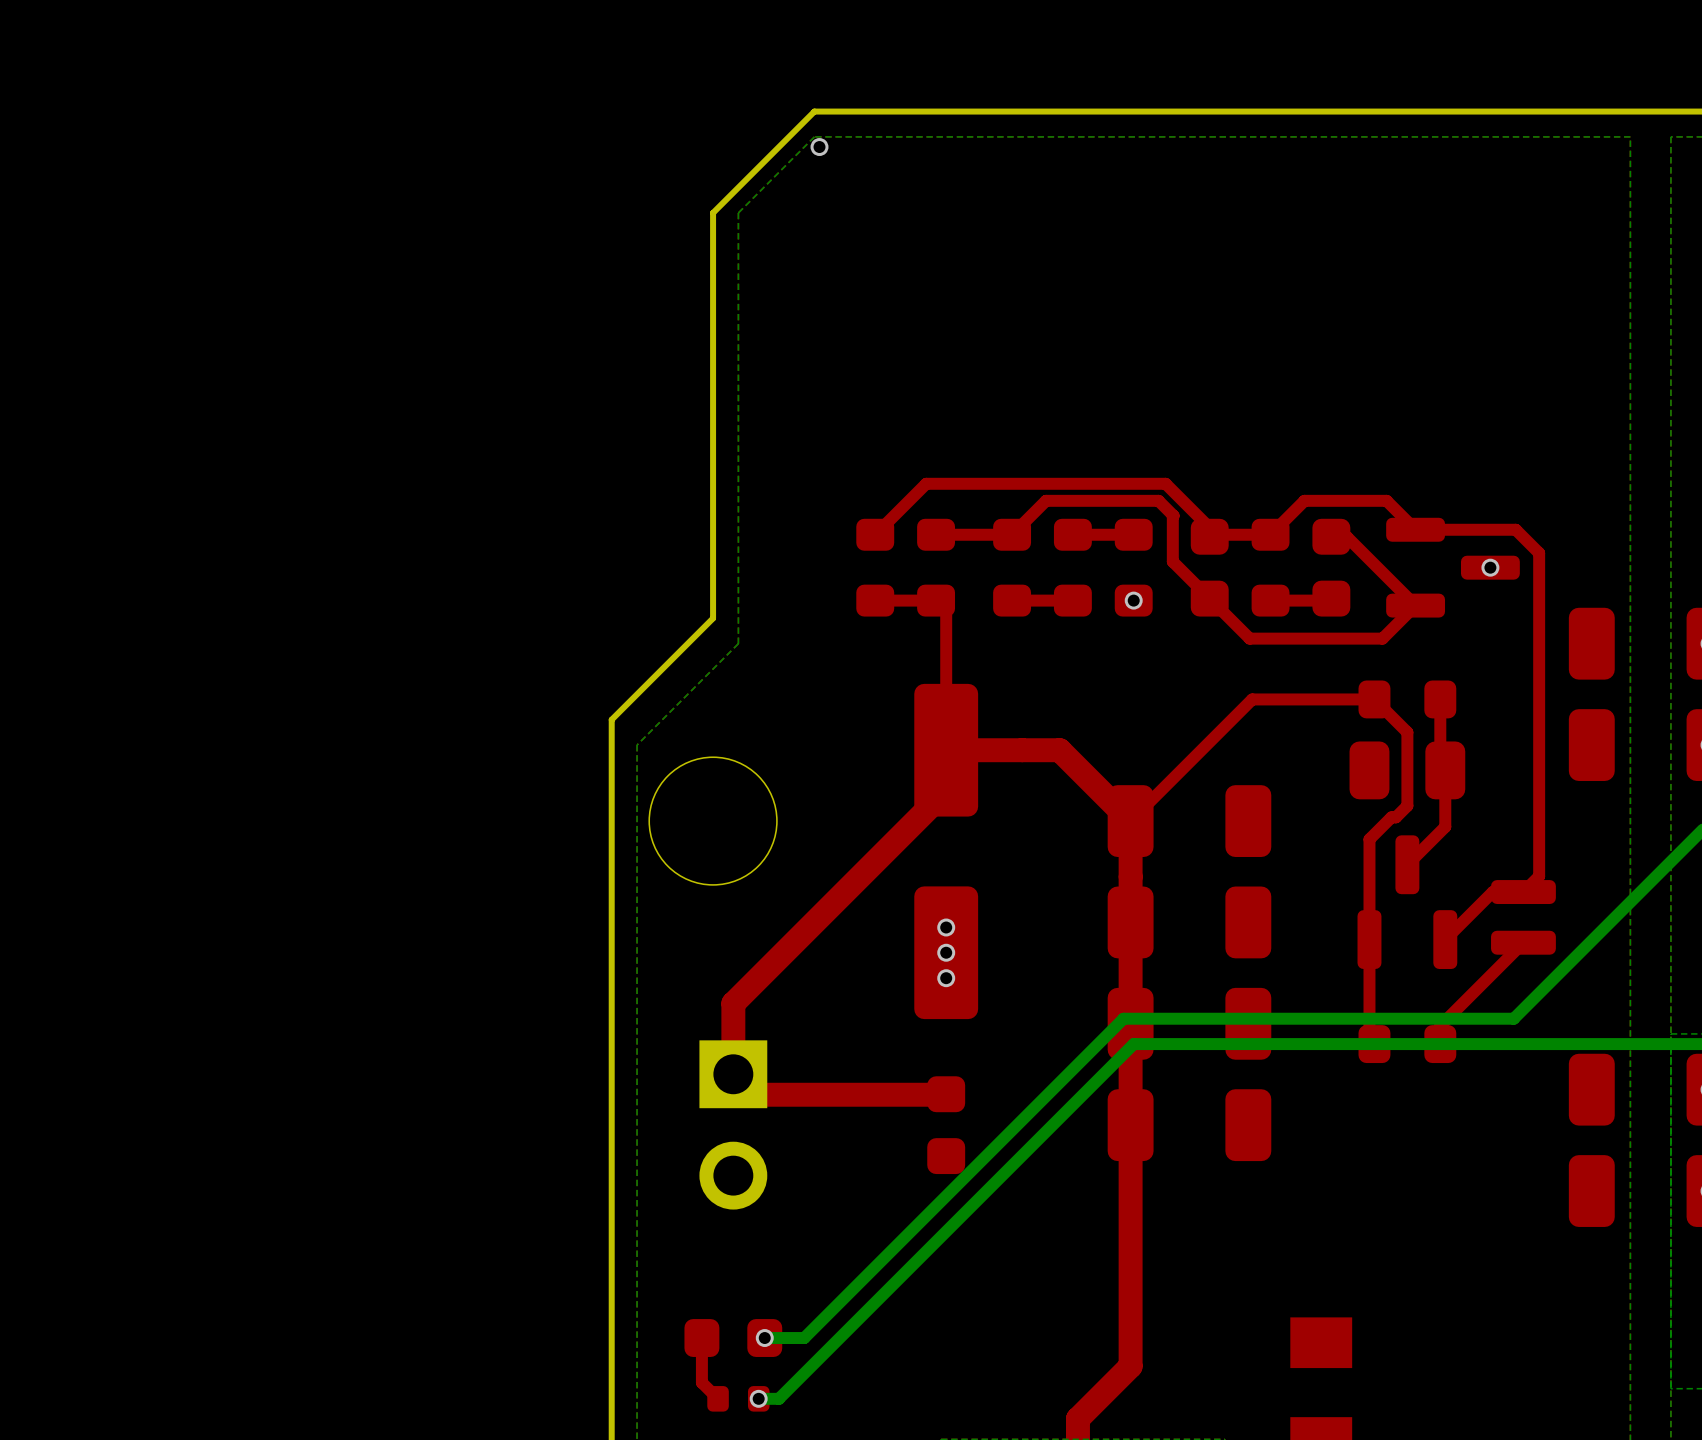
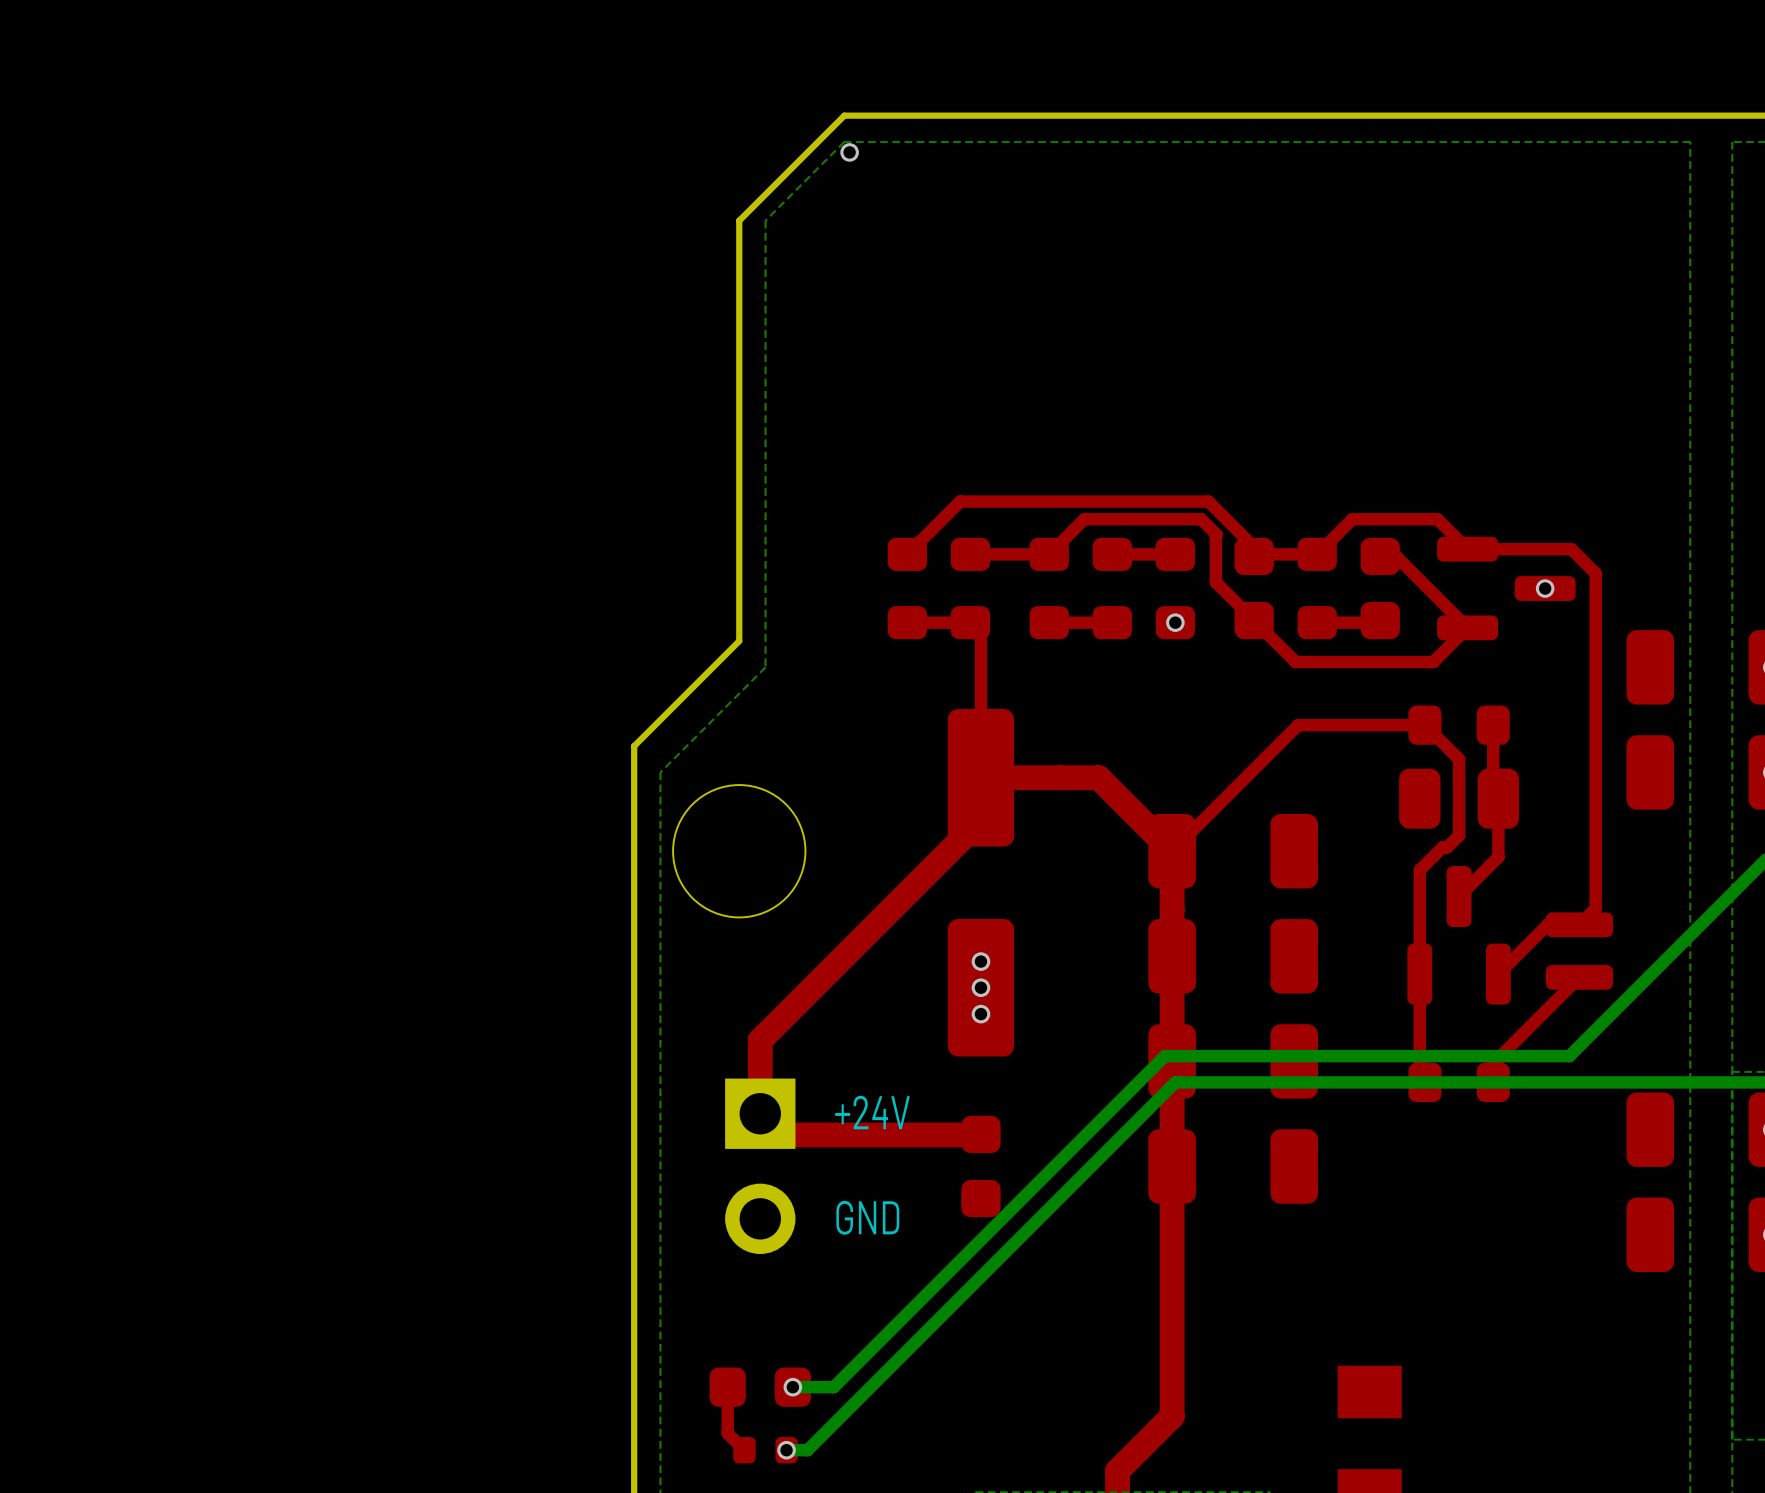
text: none -> +24V (872, 1112)
text: none -> GND (867, 1217)

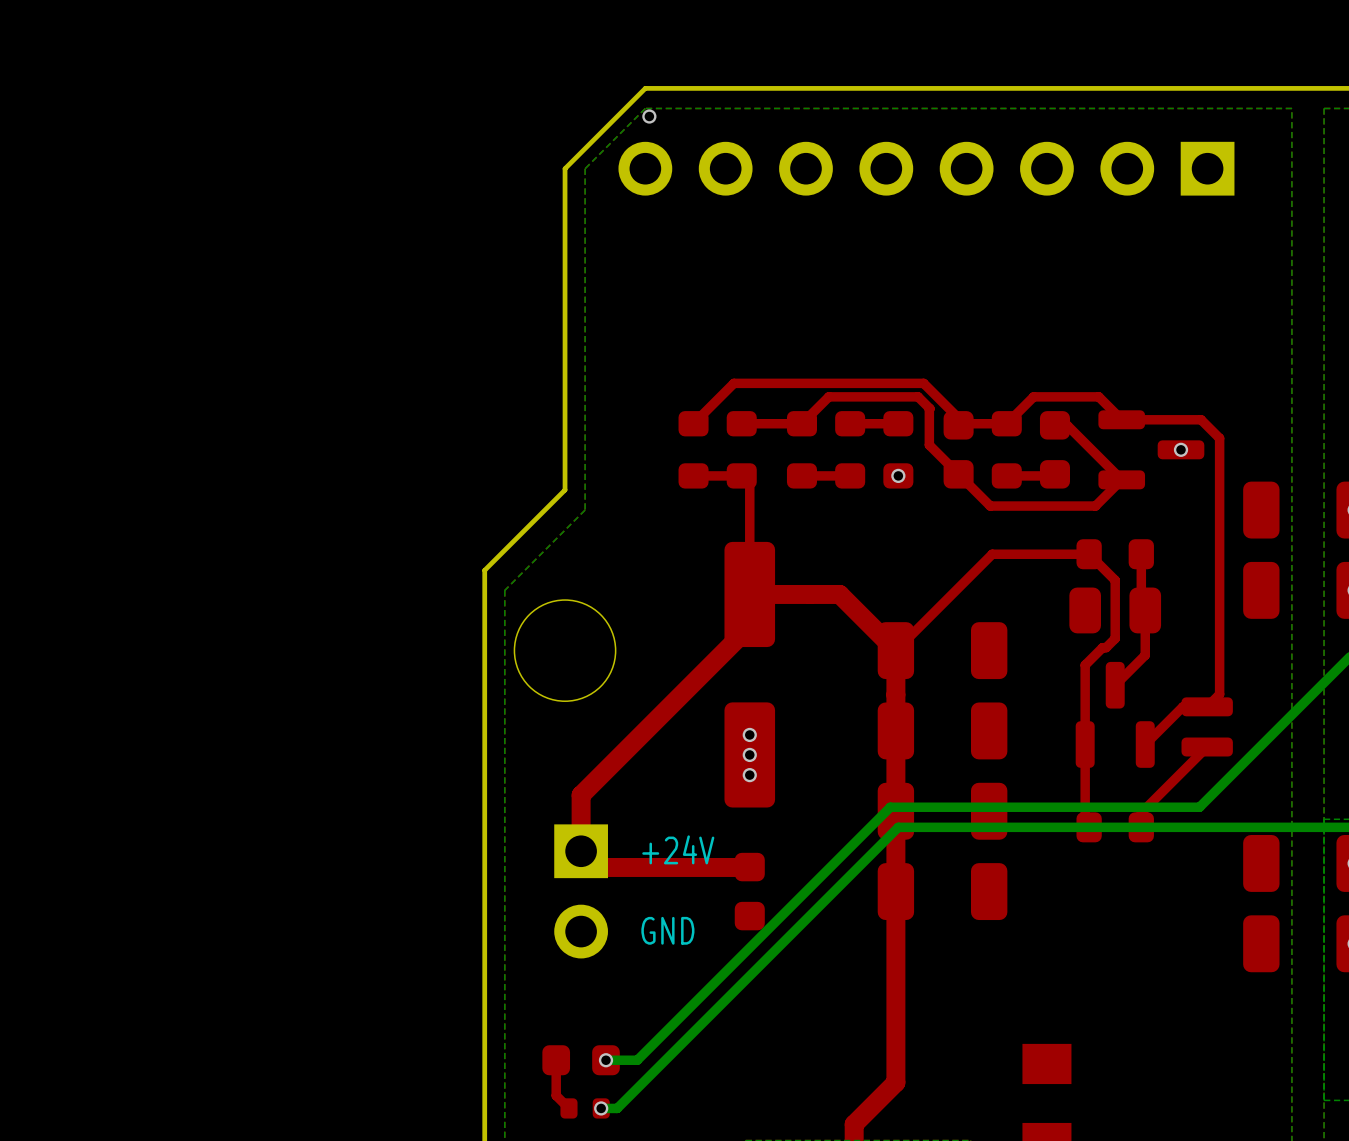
part: none -> (926, 168)

